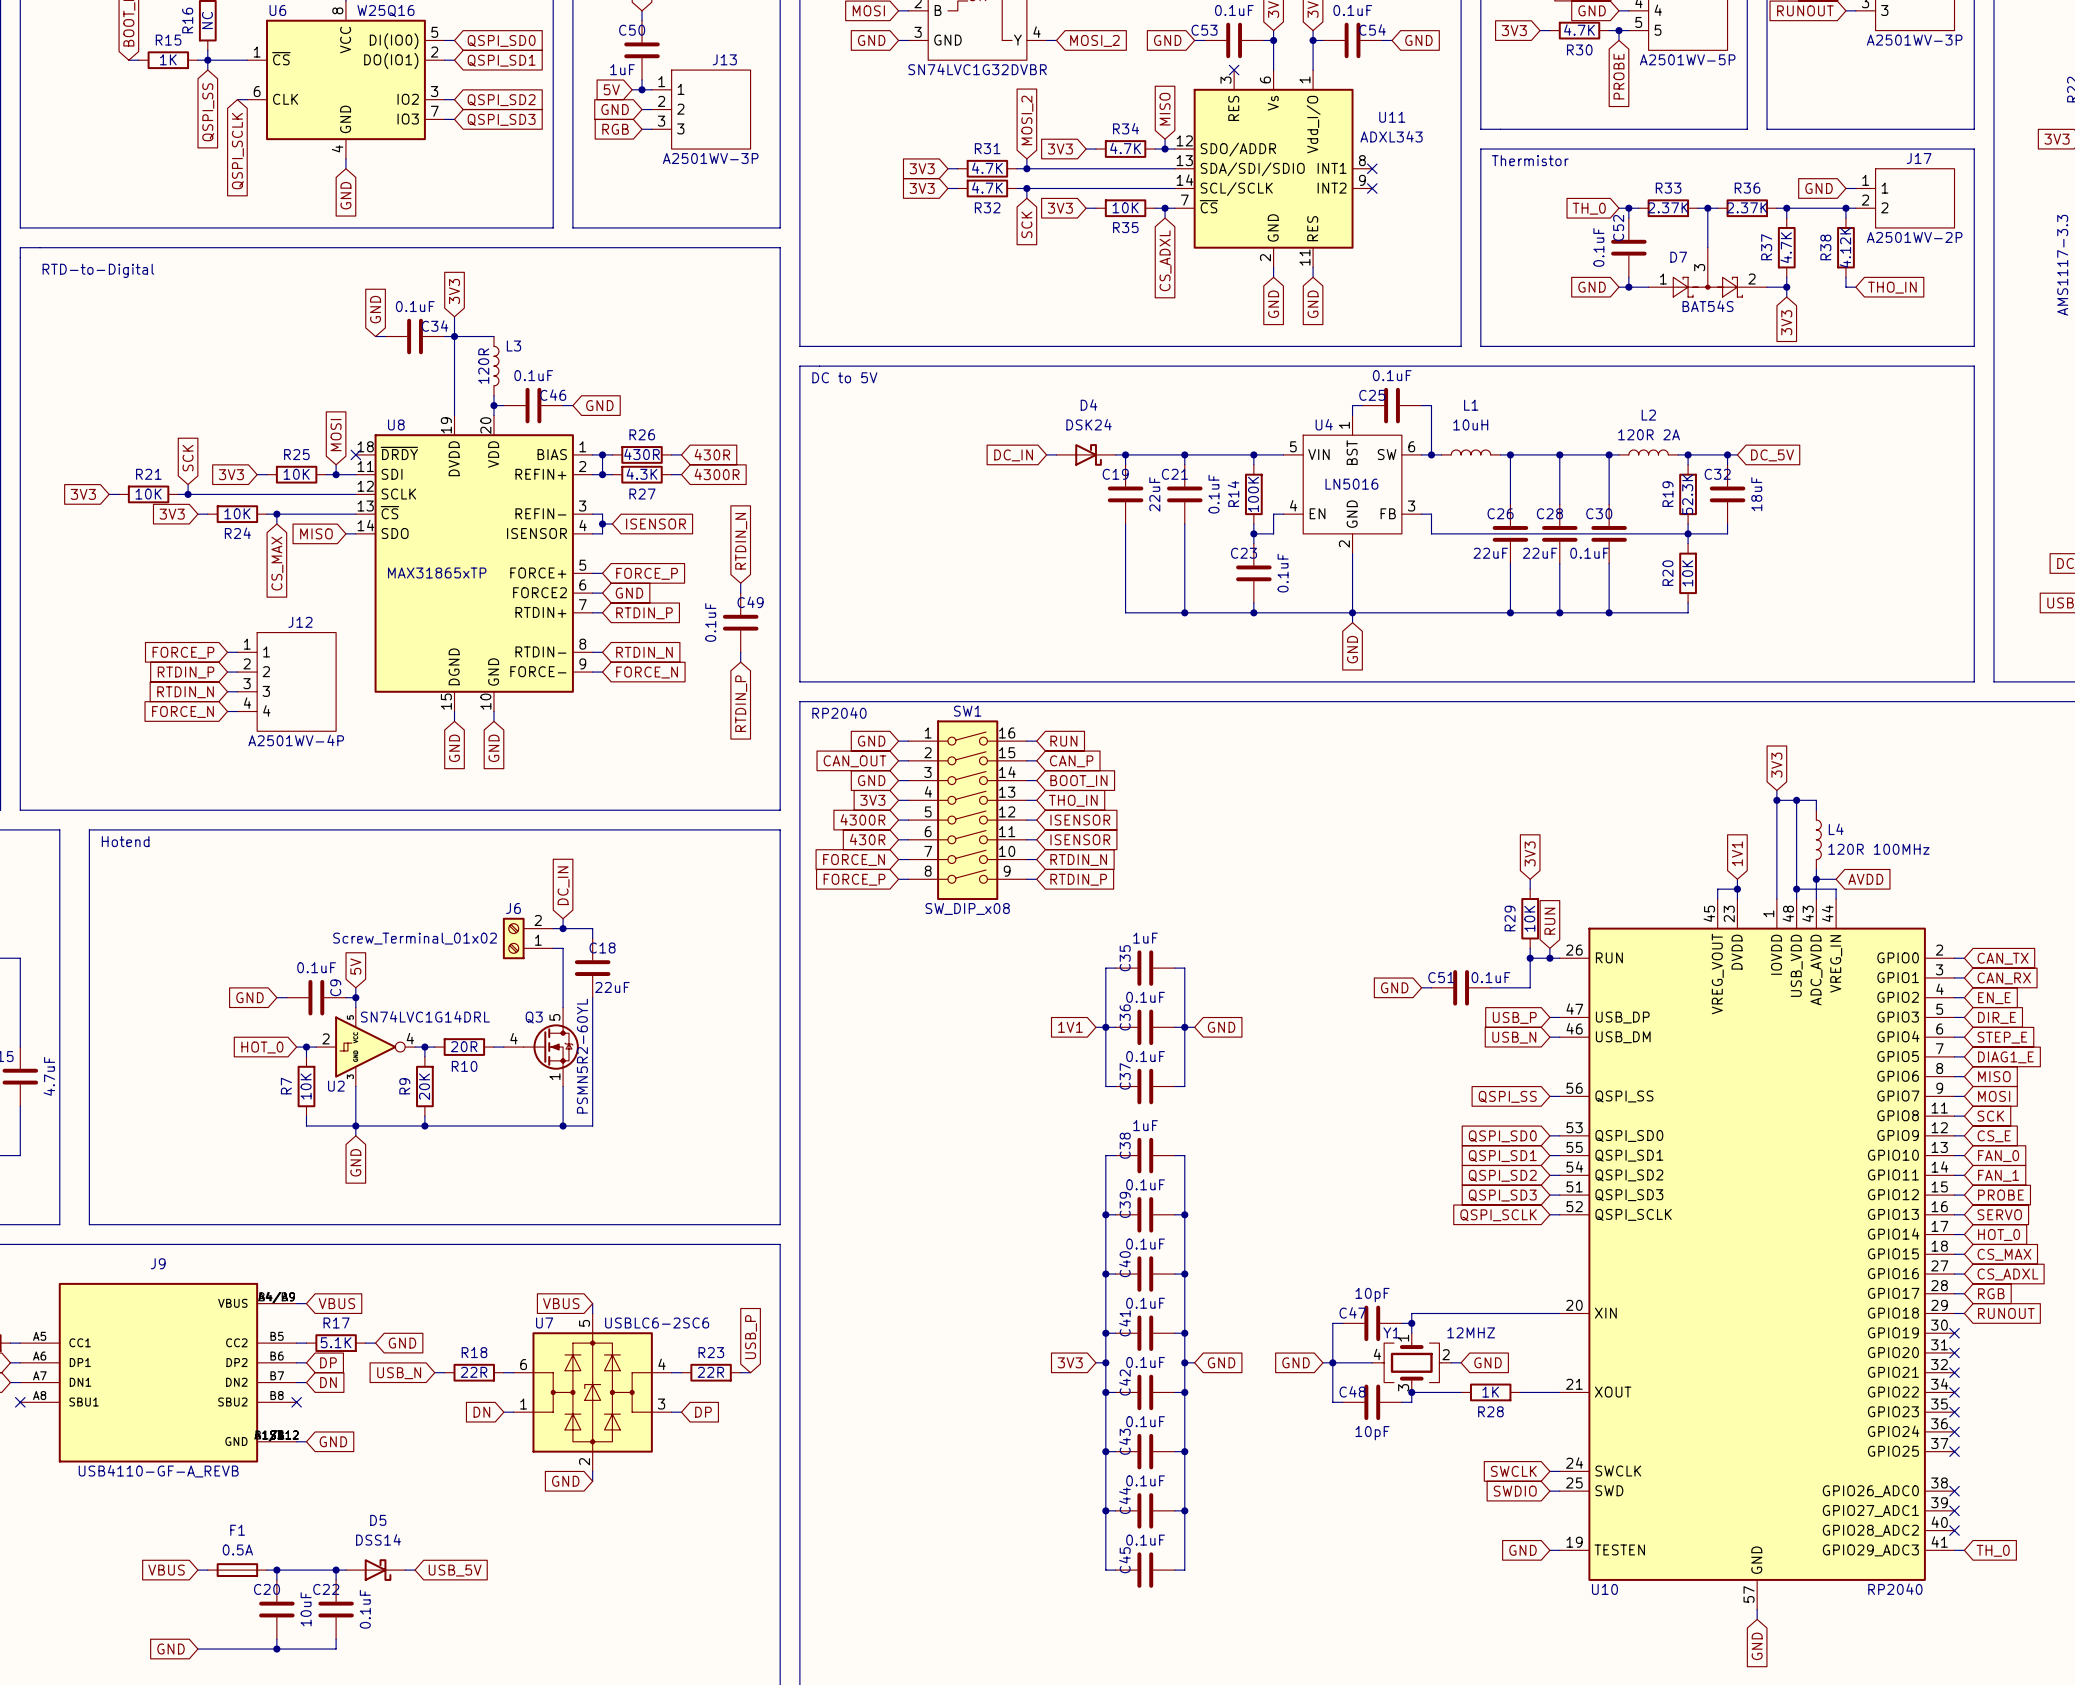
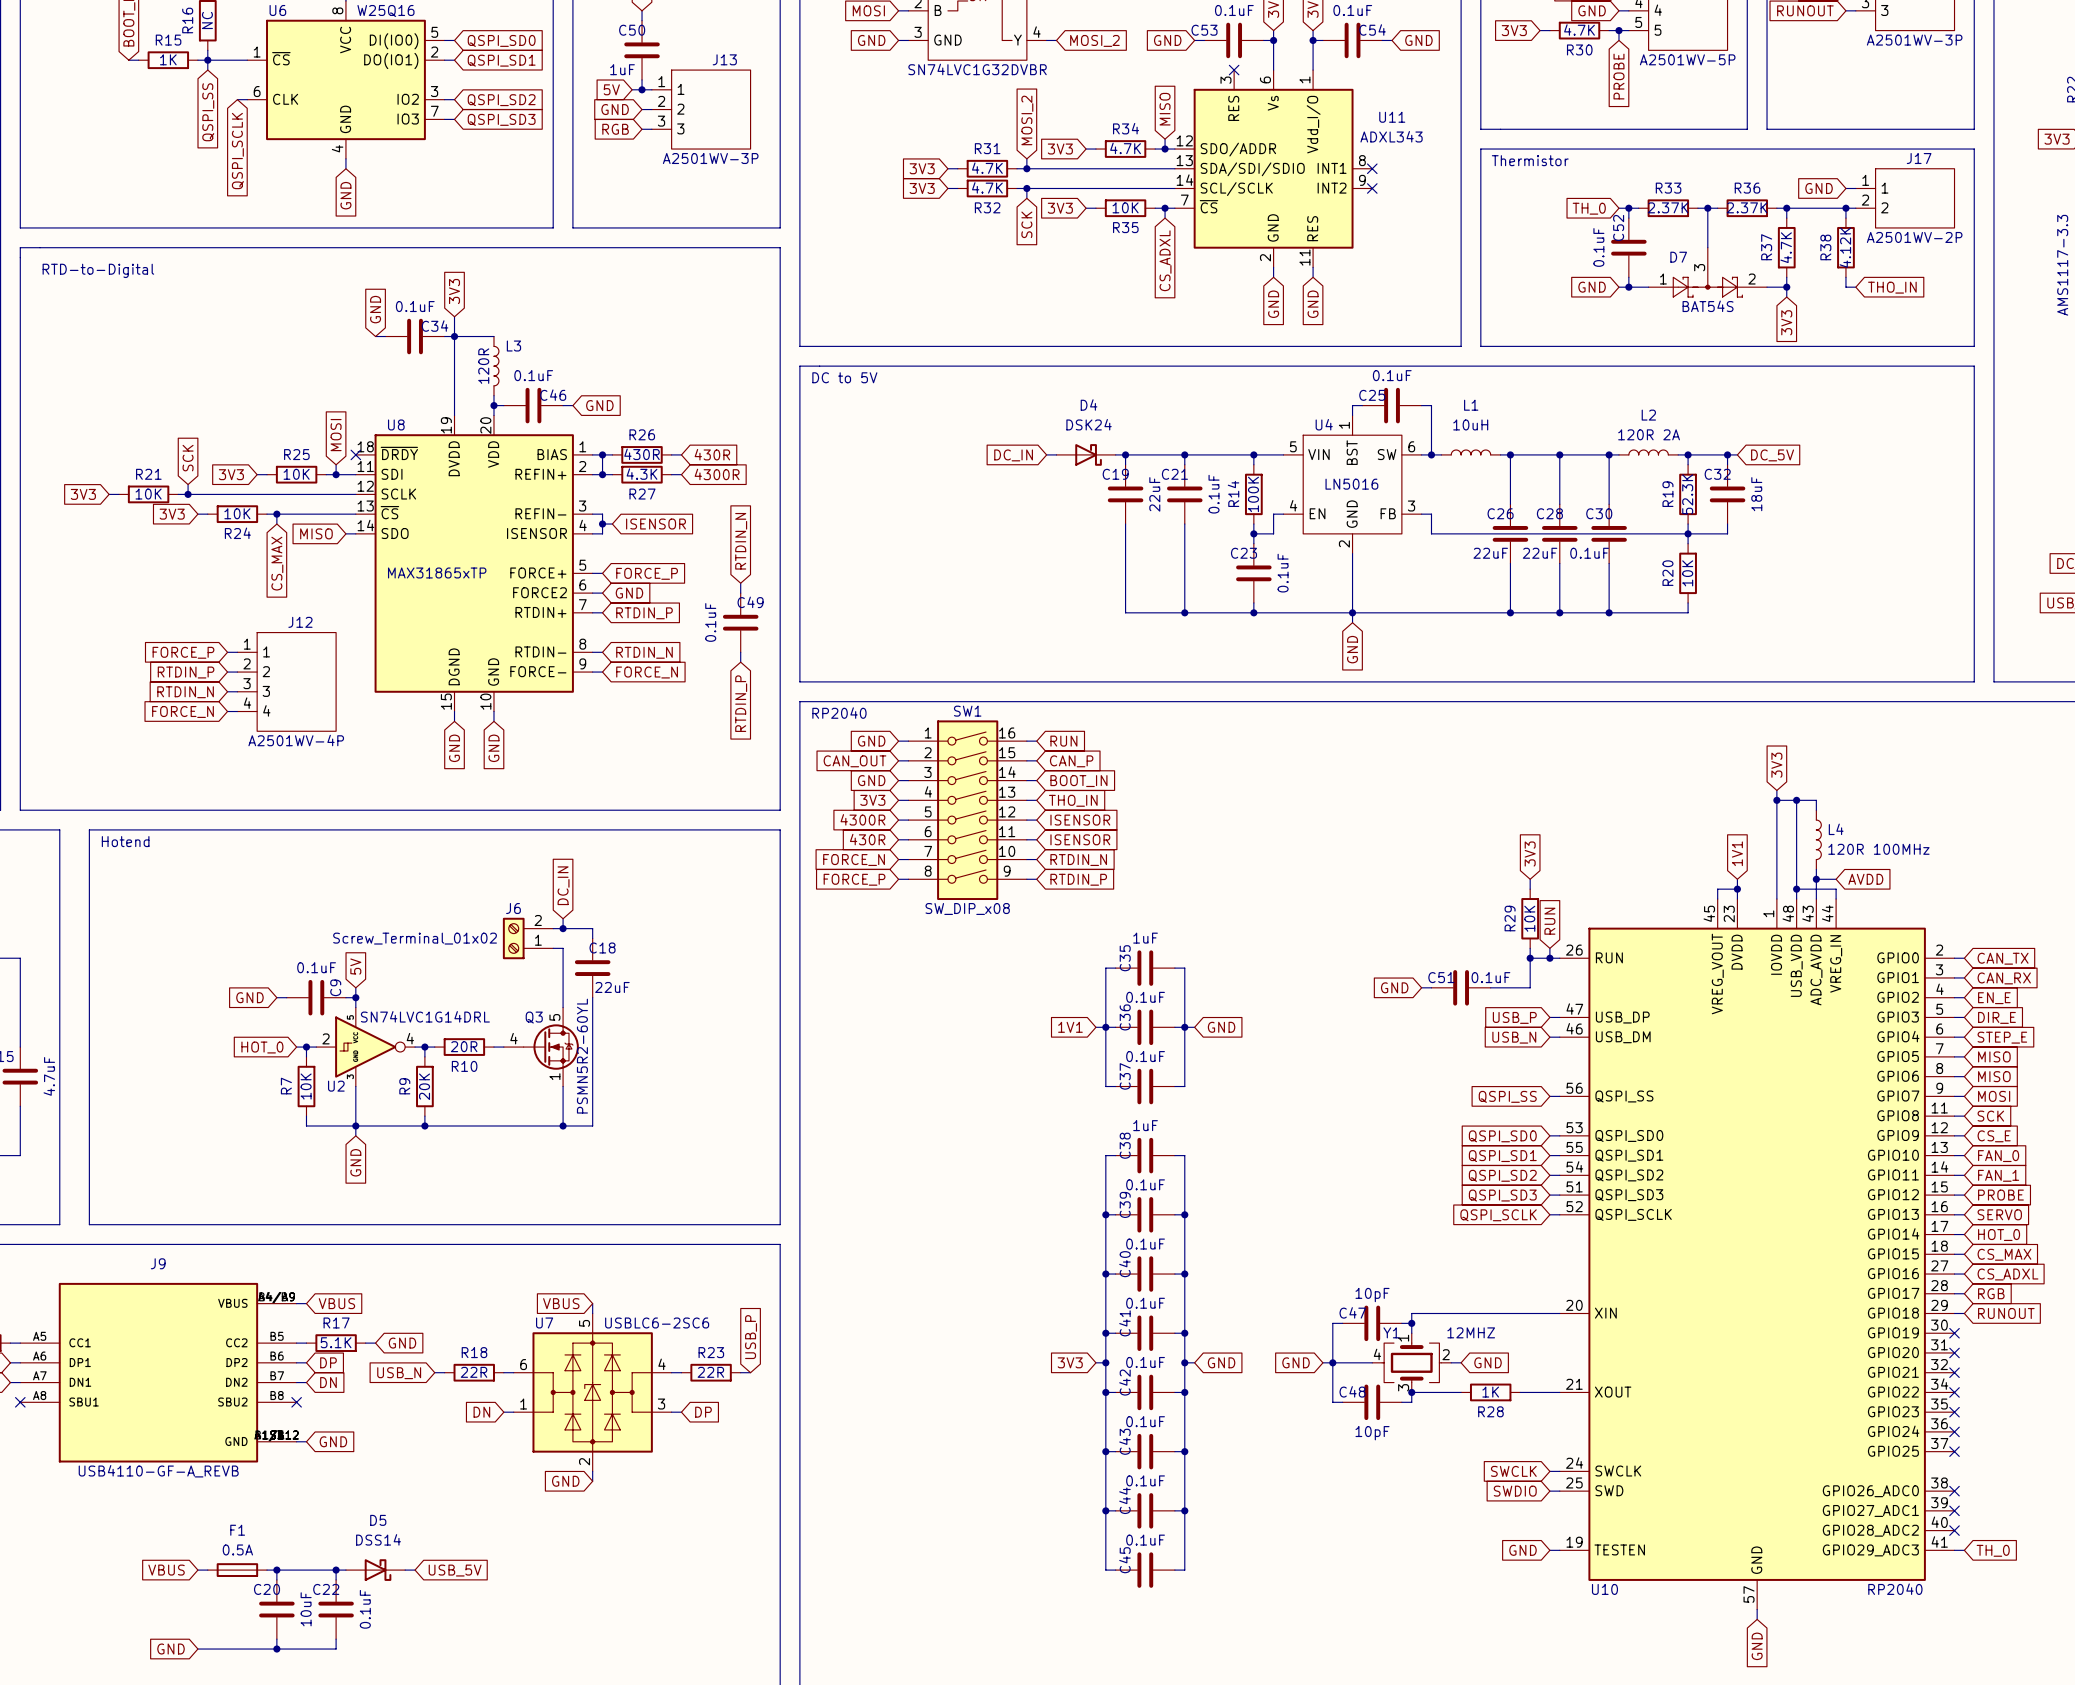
global label: DIAG1_E (2005, 1057) -> MISO (1994, 1056)

